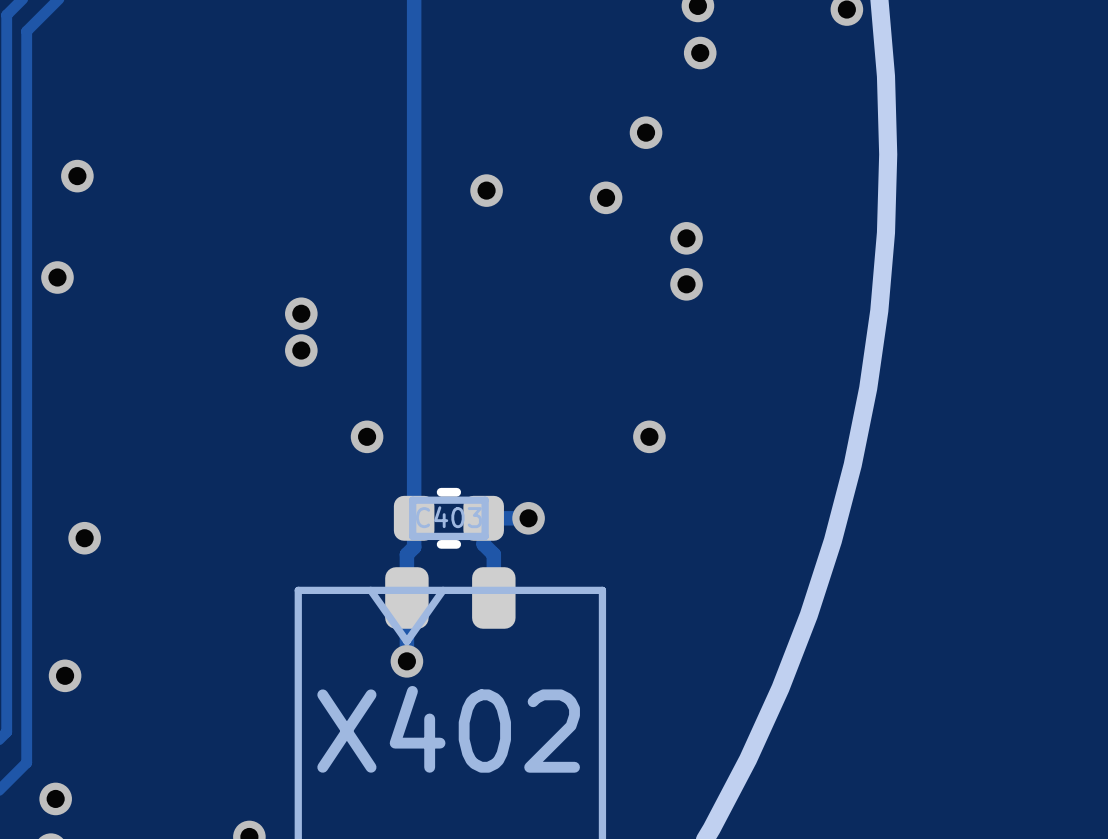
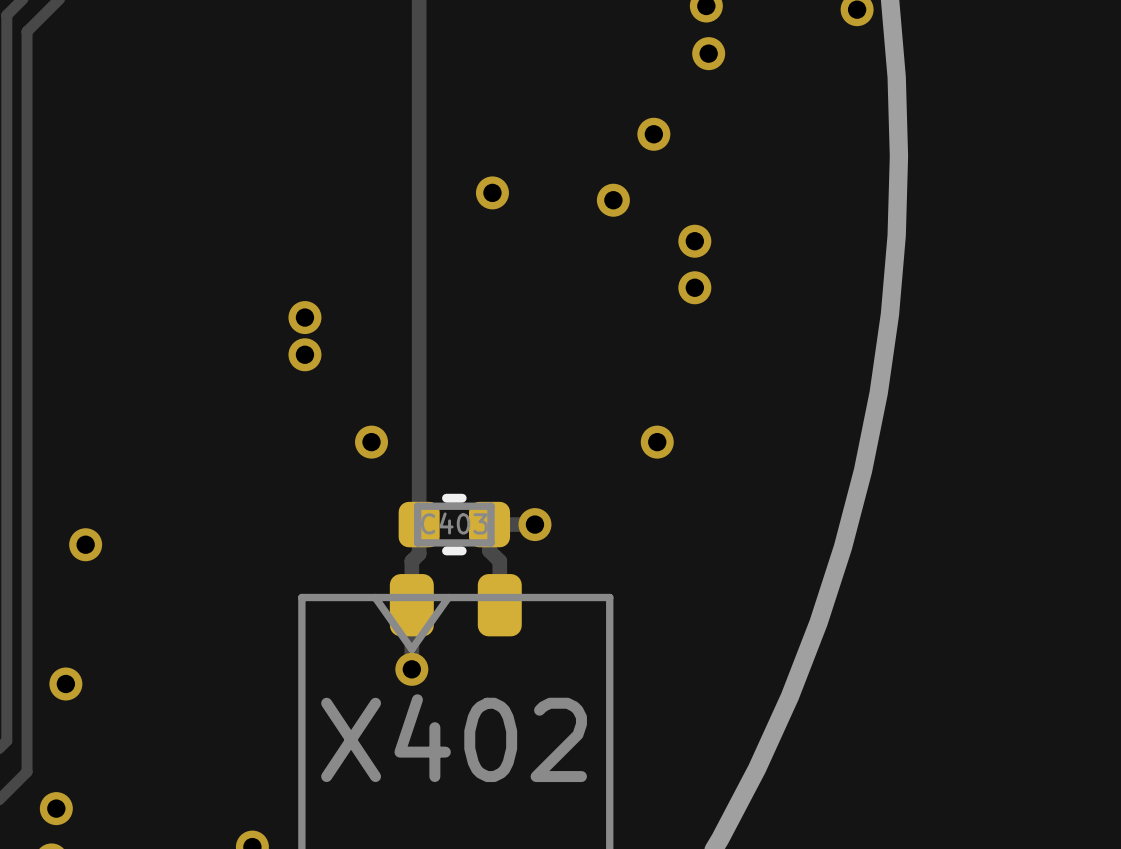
via: (77, 176) -> none
via: (57, 277) -> none

